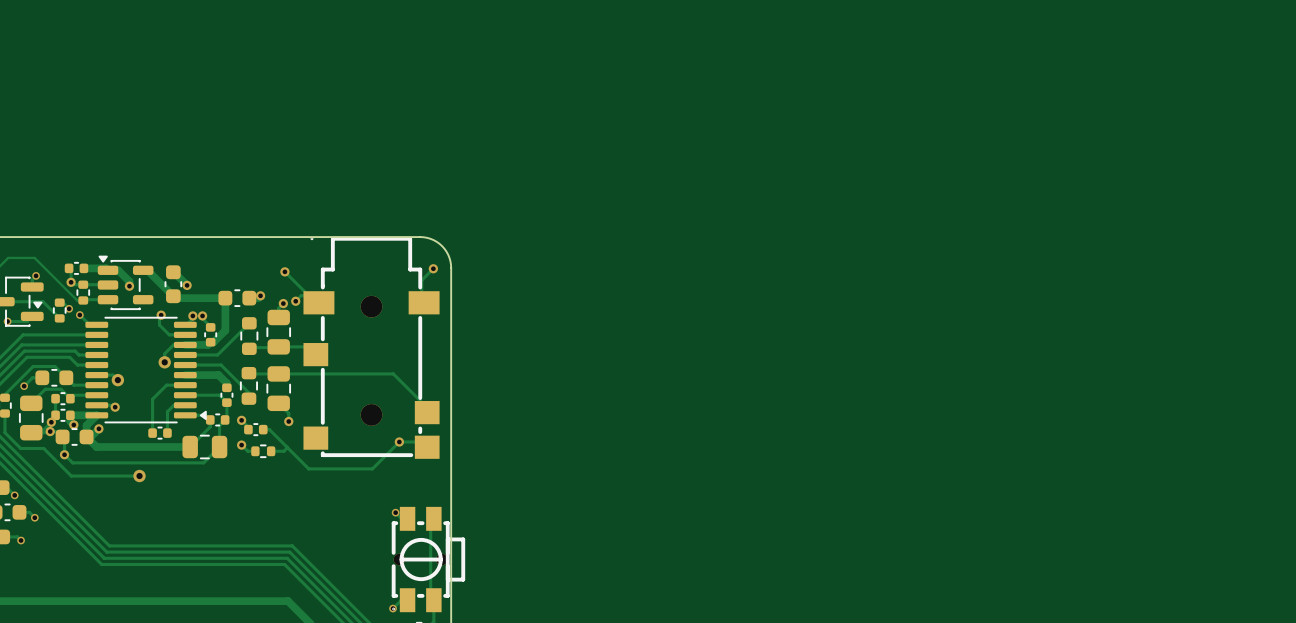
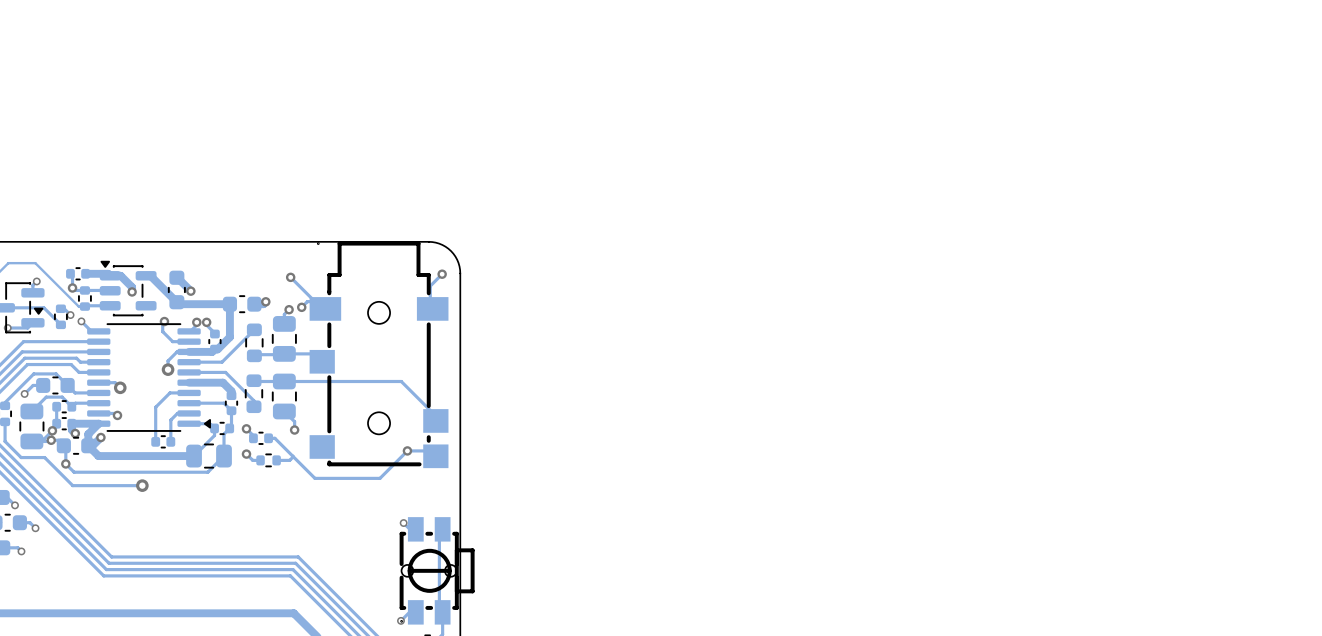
part footprint: [303, 236, 440, 459] -> [309, 241, 449, 469]
part footprint: [391, 506, 466, 613] -> [399, 517, 475, 625]

